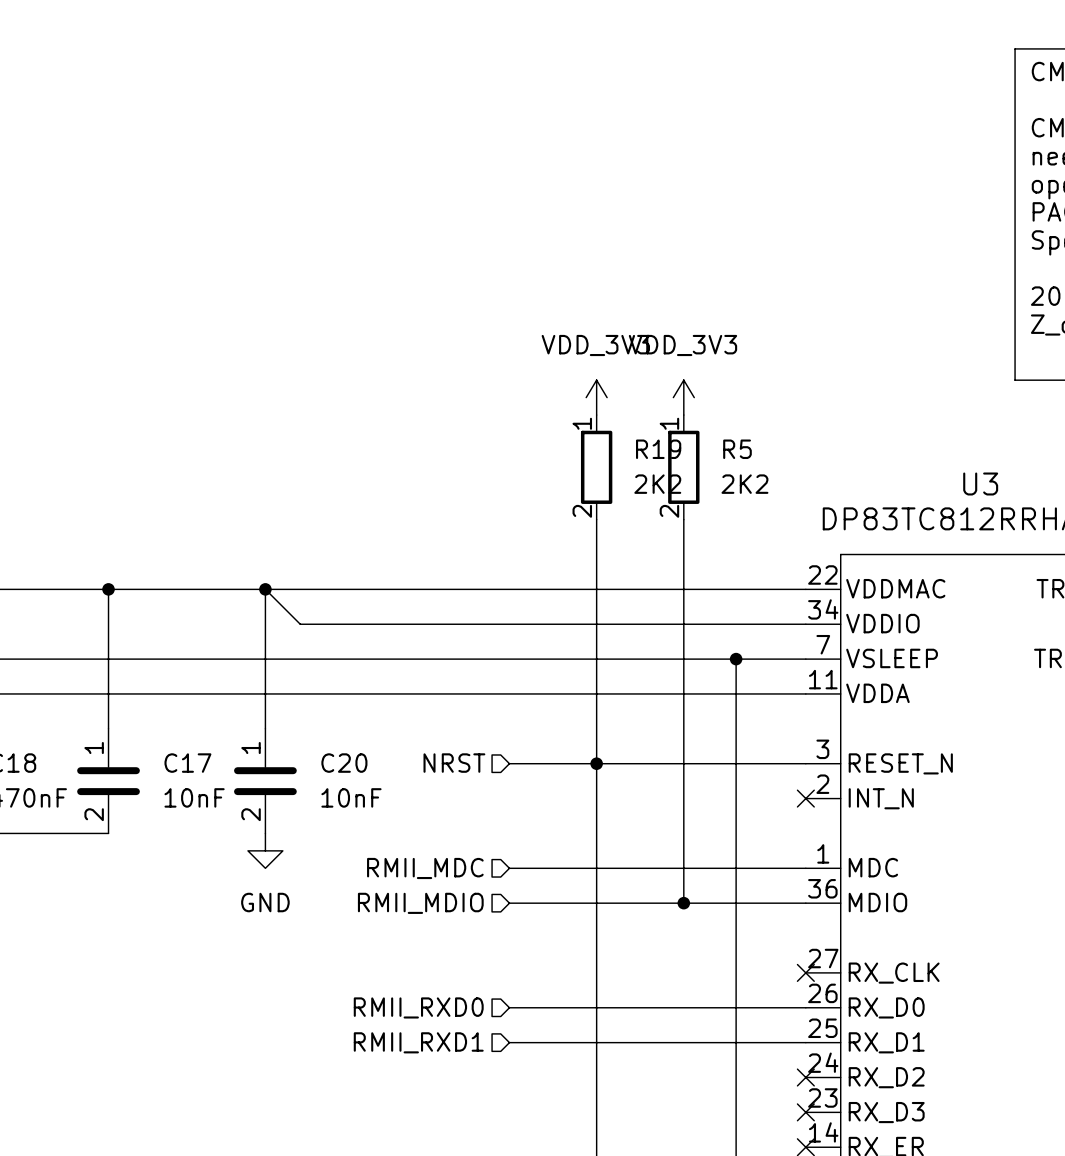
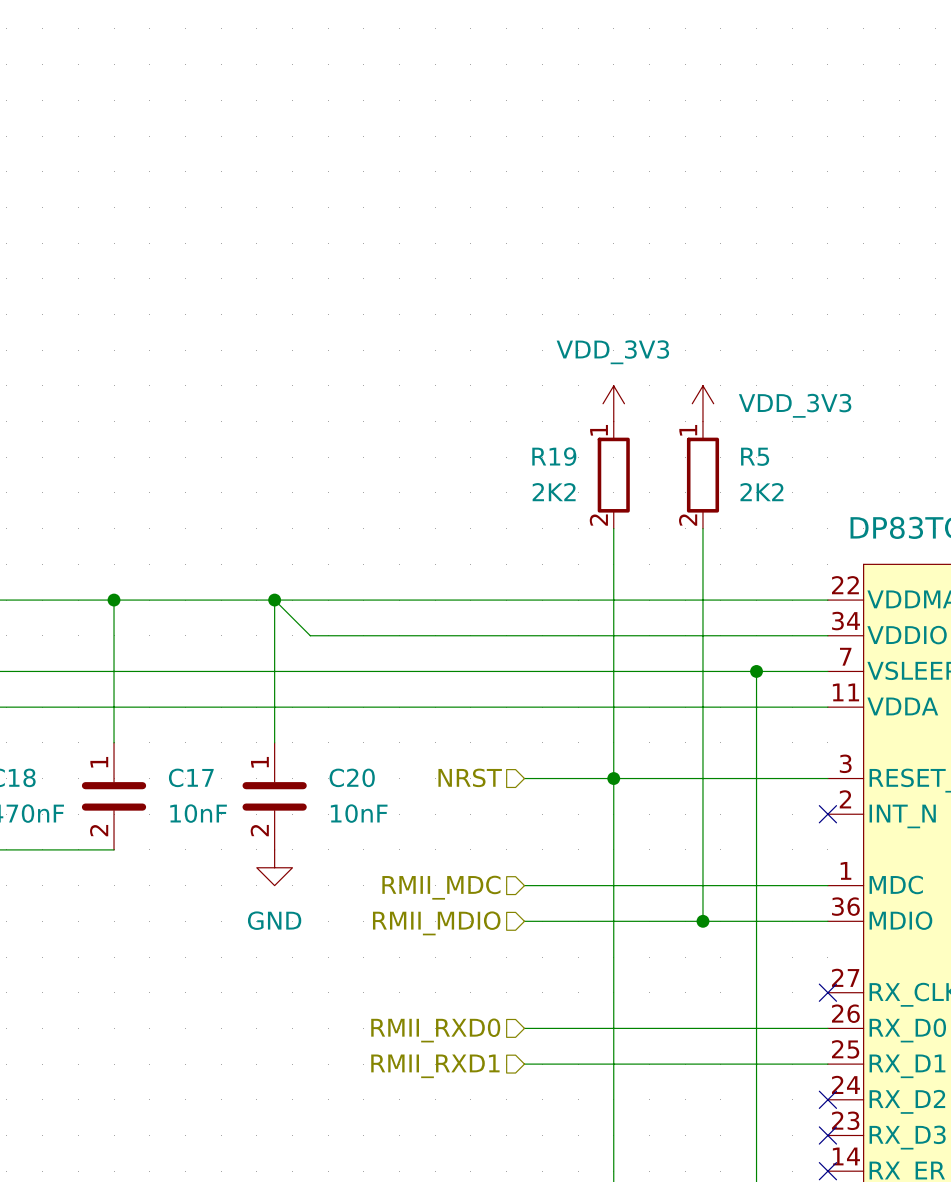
power symbol text position: VDD_3V3 (682, 345) -> VDD_3V3 (795, 405)
R19 name position: R19 (658, 449) -> R19 (554, 456)
R19 value position: 2K2 (657, 484) -> 2K2 (554, 492)

